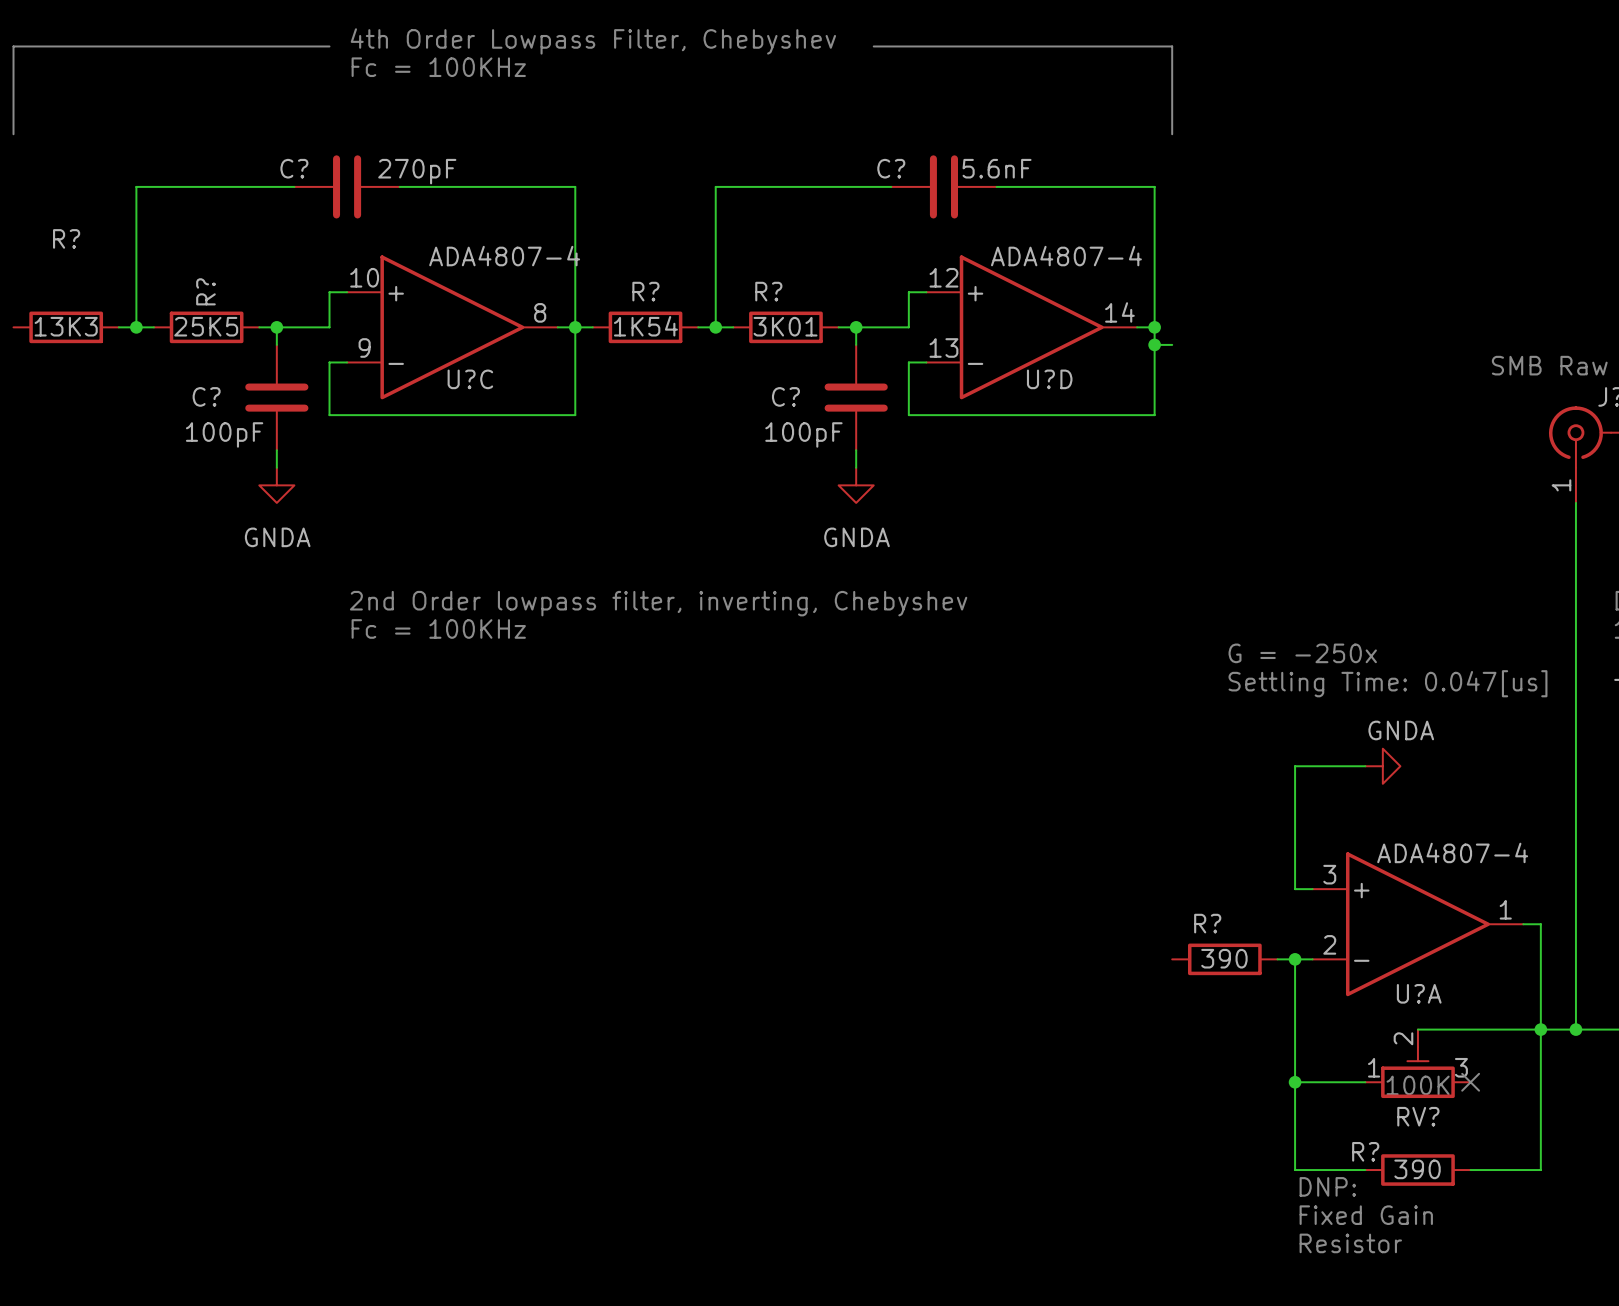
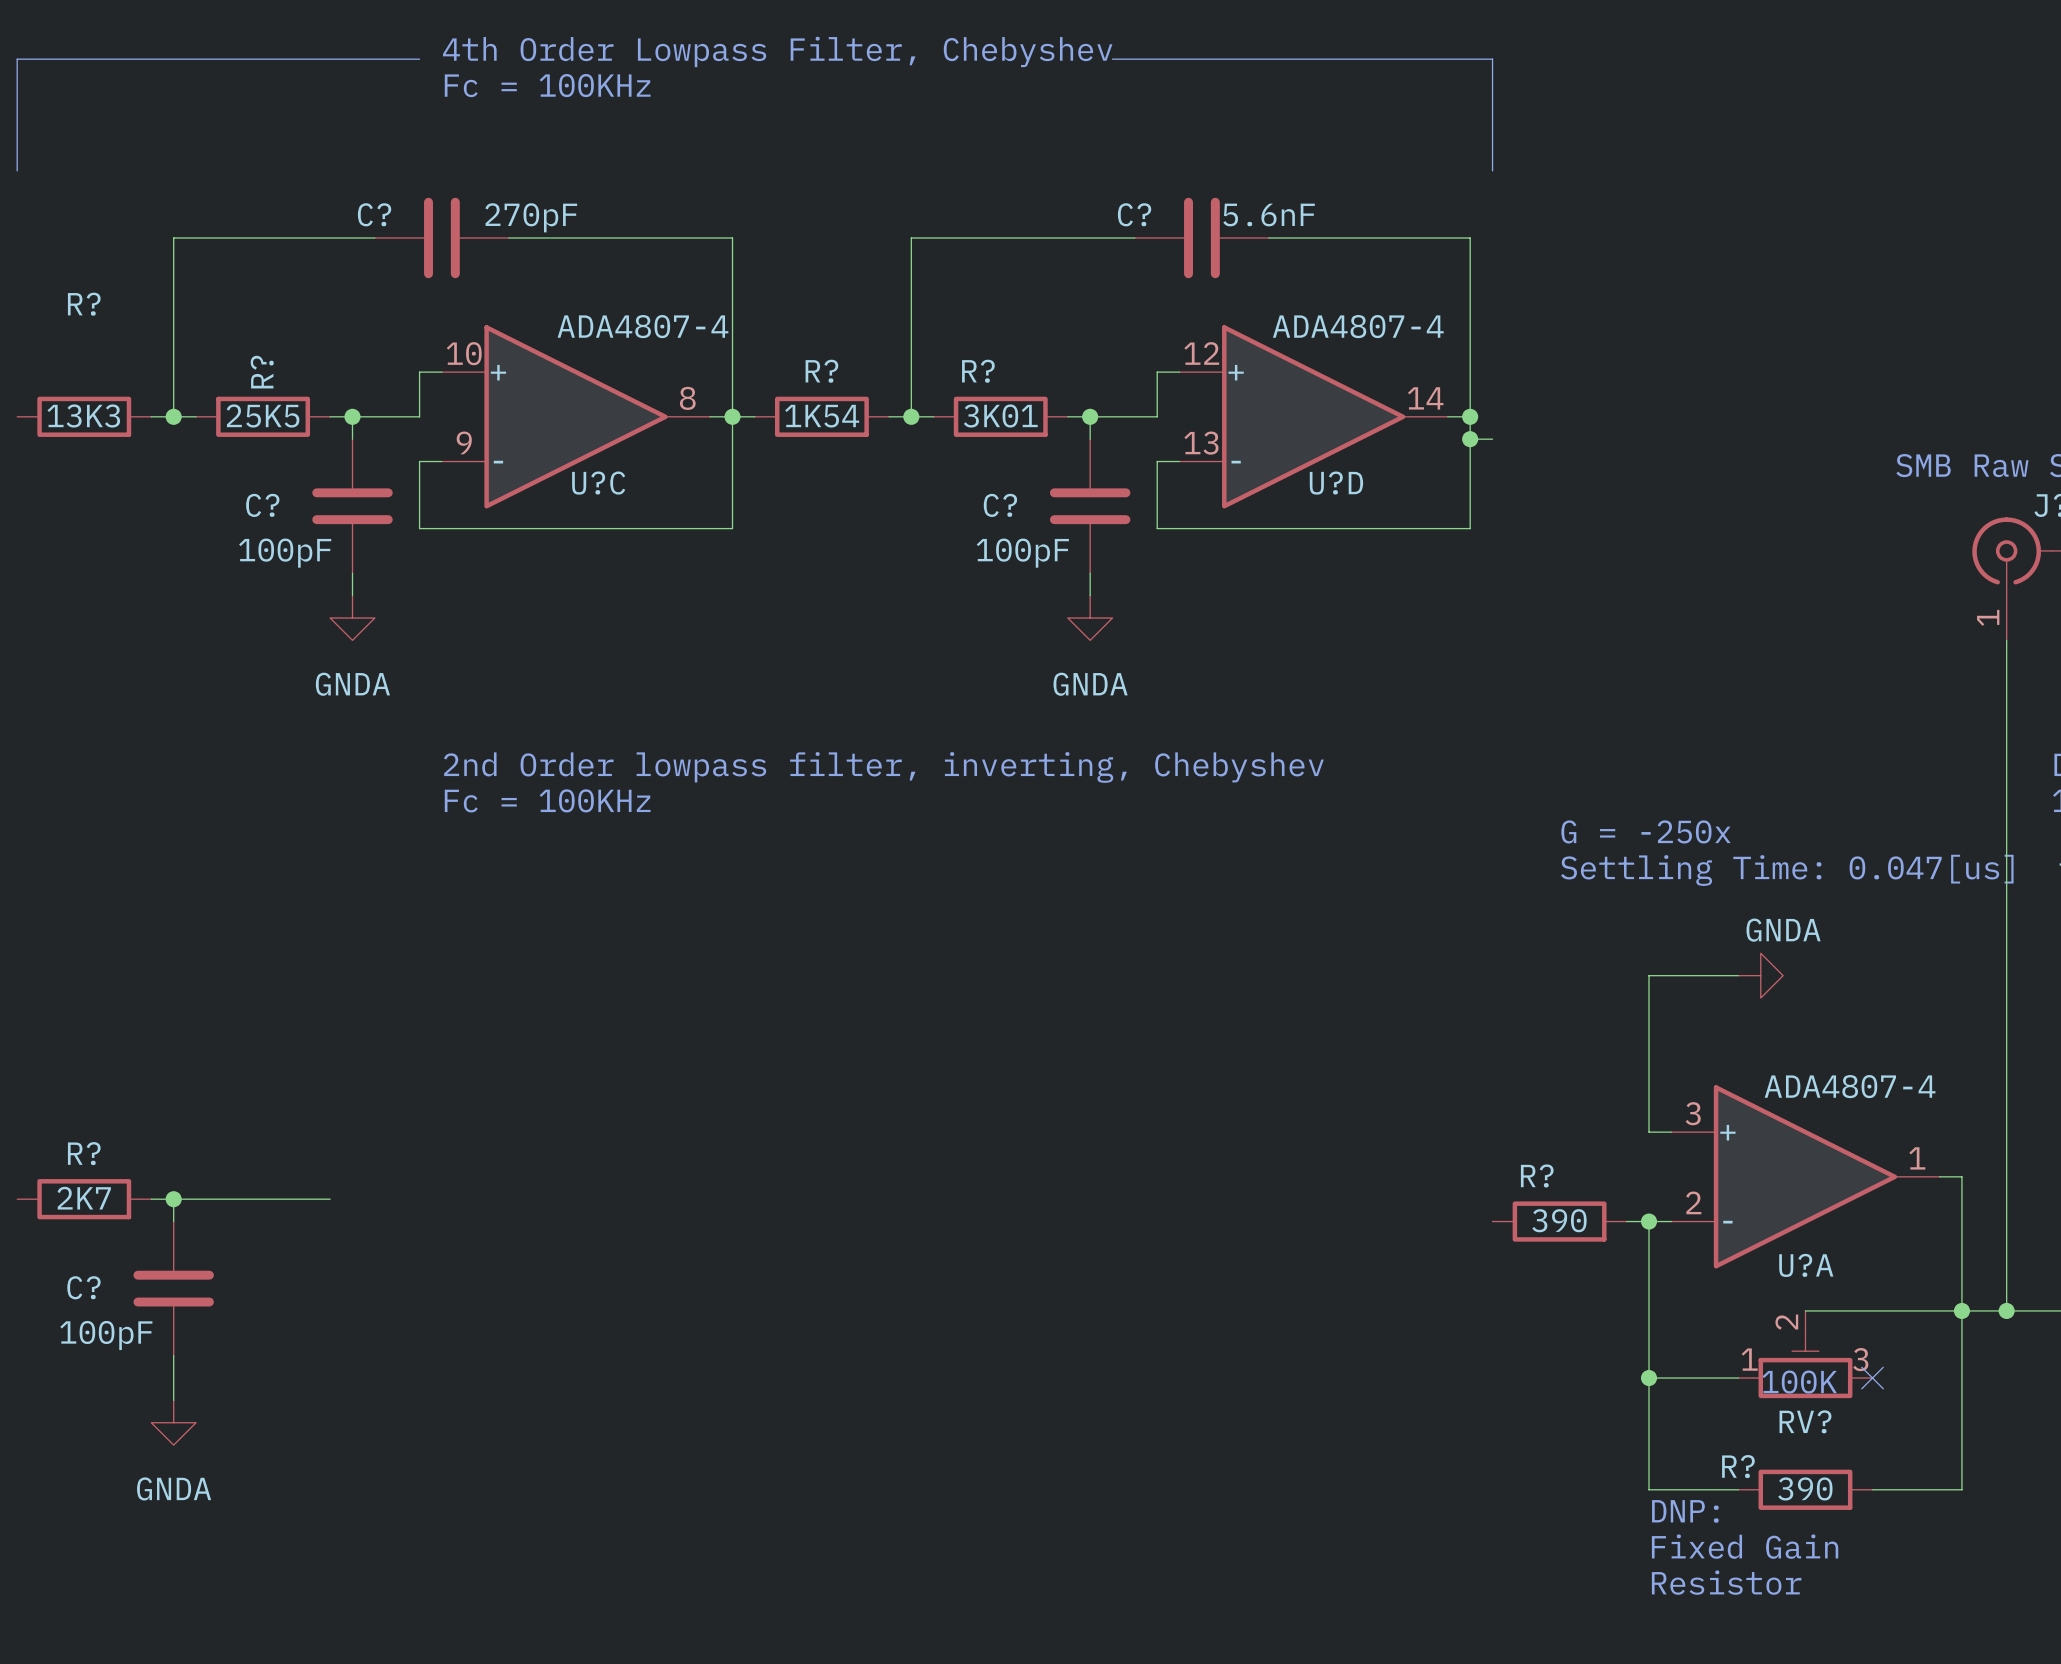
R?: none -> 2K7 (84, 1199)
wire: none -> (151, 1199) (330, 1199)
wire: none -> (173, 1199) (173, 1221)
junction: none -> (173, 1199)
C?: none -> 100pF (173, 1288)
wire: none -> (173, 1355) (173, 1400)
power symbol: none -> GNDA (173, 1422)

